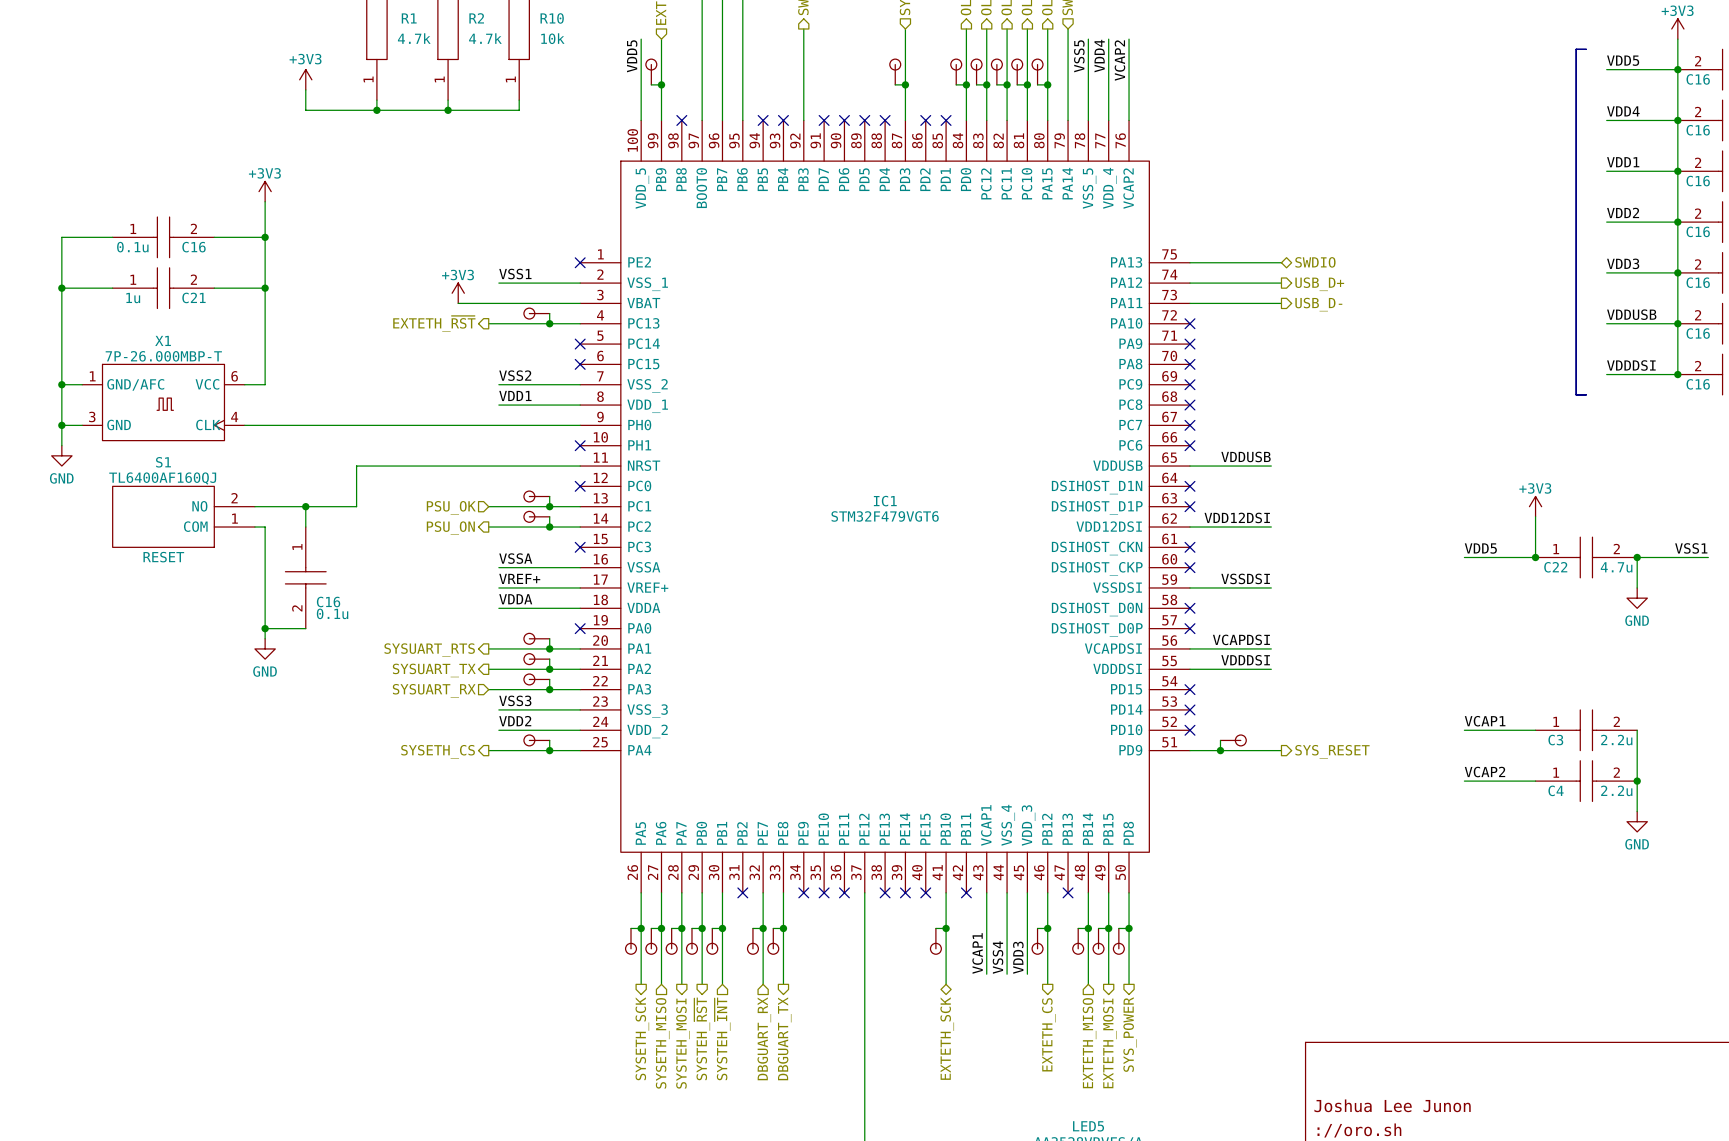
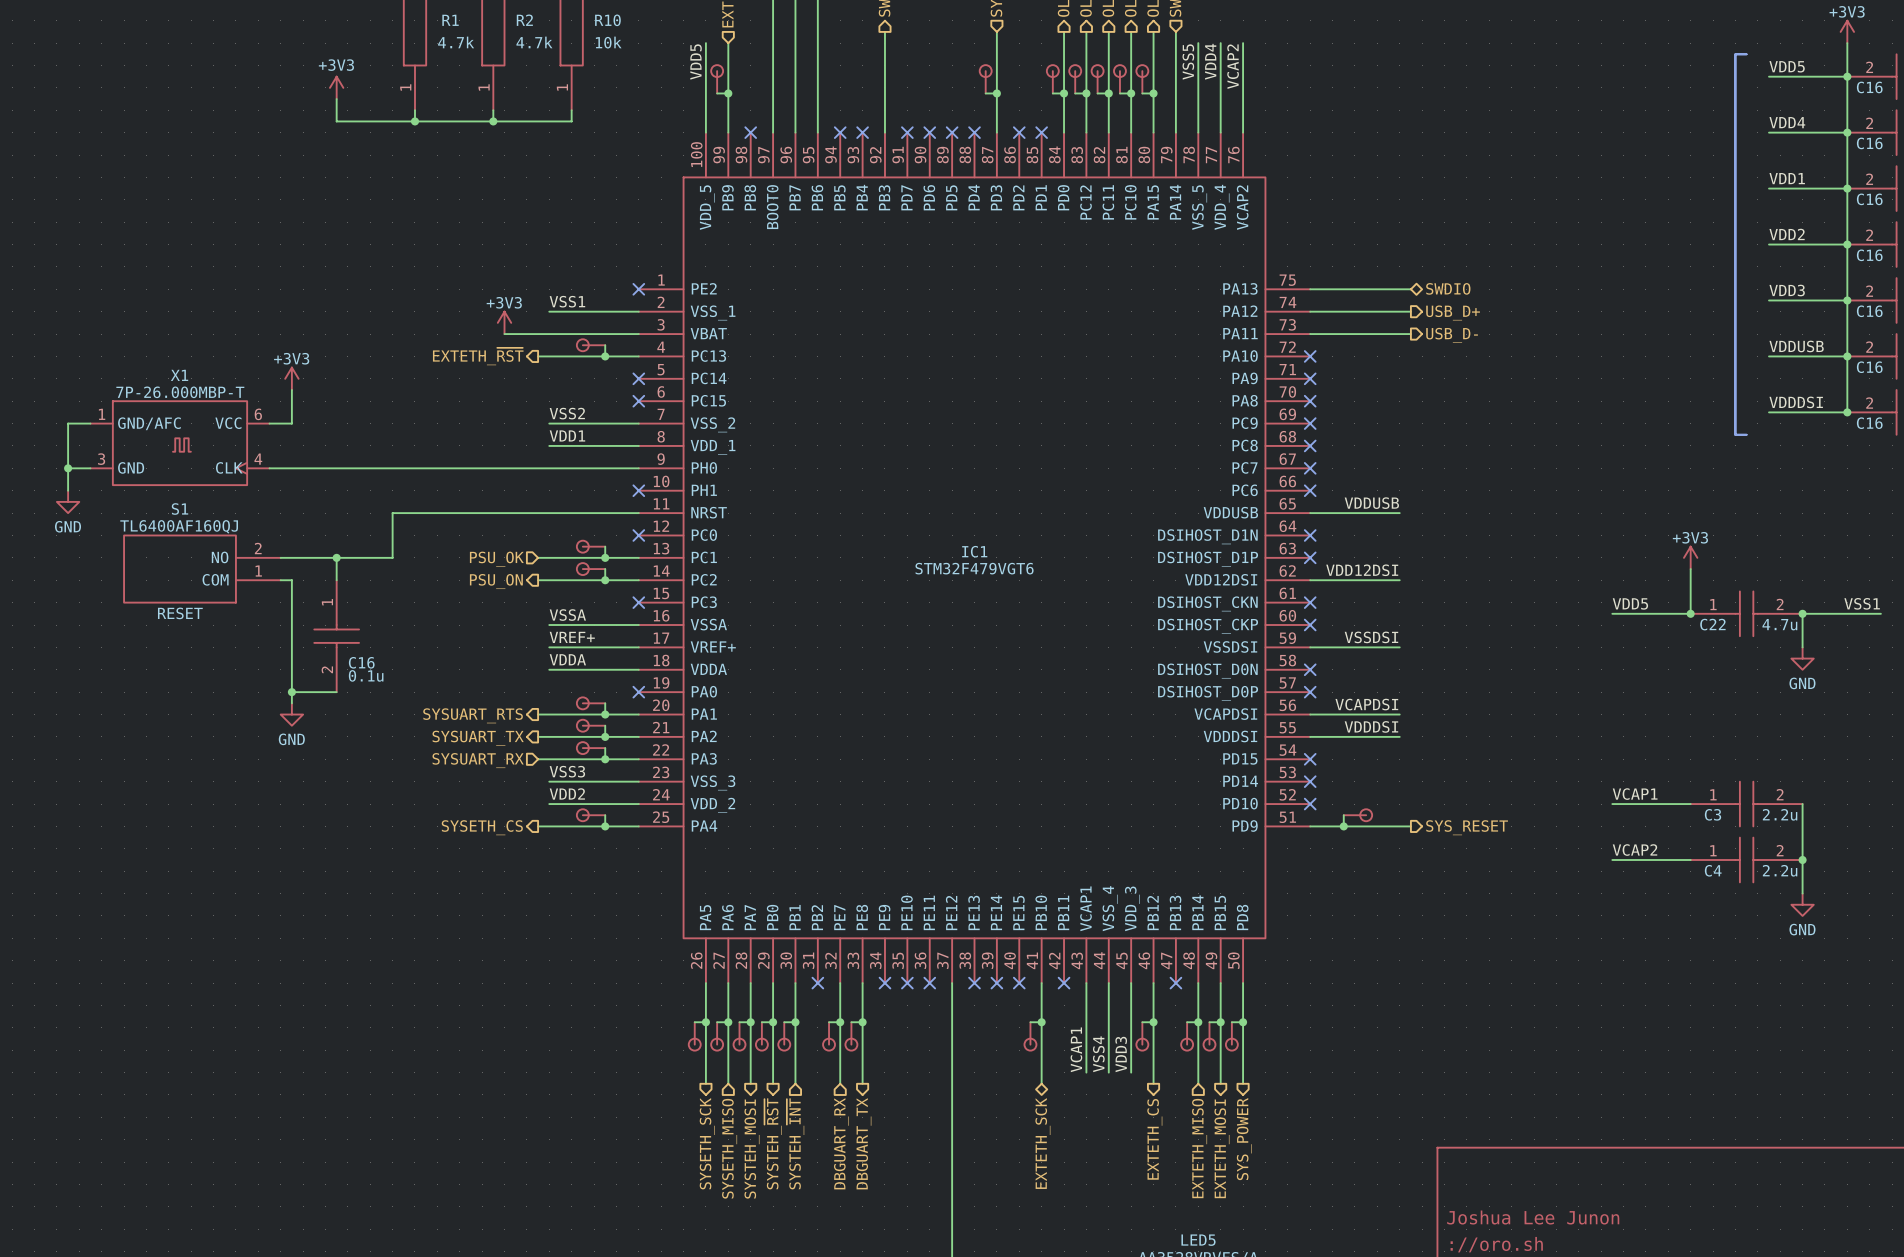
power symbol position: +3V3 (265, 191) -> +3V3 (291, 378)
wire: (265, 201) (265, 354) -> none
wire: (112, 237) (61, 237) (61, 384) -> none
C16: 0.1u (163, 237) -> none
wire: (214, 237) (265, 237) -> none
junction: (265, 237) -> none
wire: (61, 288) (112, 288) -> none
junction: (61, 288) -> none
C21: 1u (163, 288) -> none
wire: (214, 288) (265, 288) -> none
junction: (265, 288) -> none
junction: (61, 384) -> none

